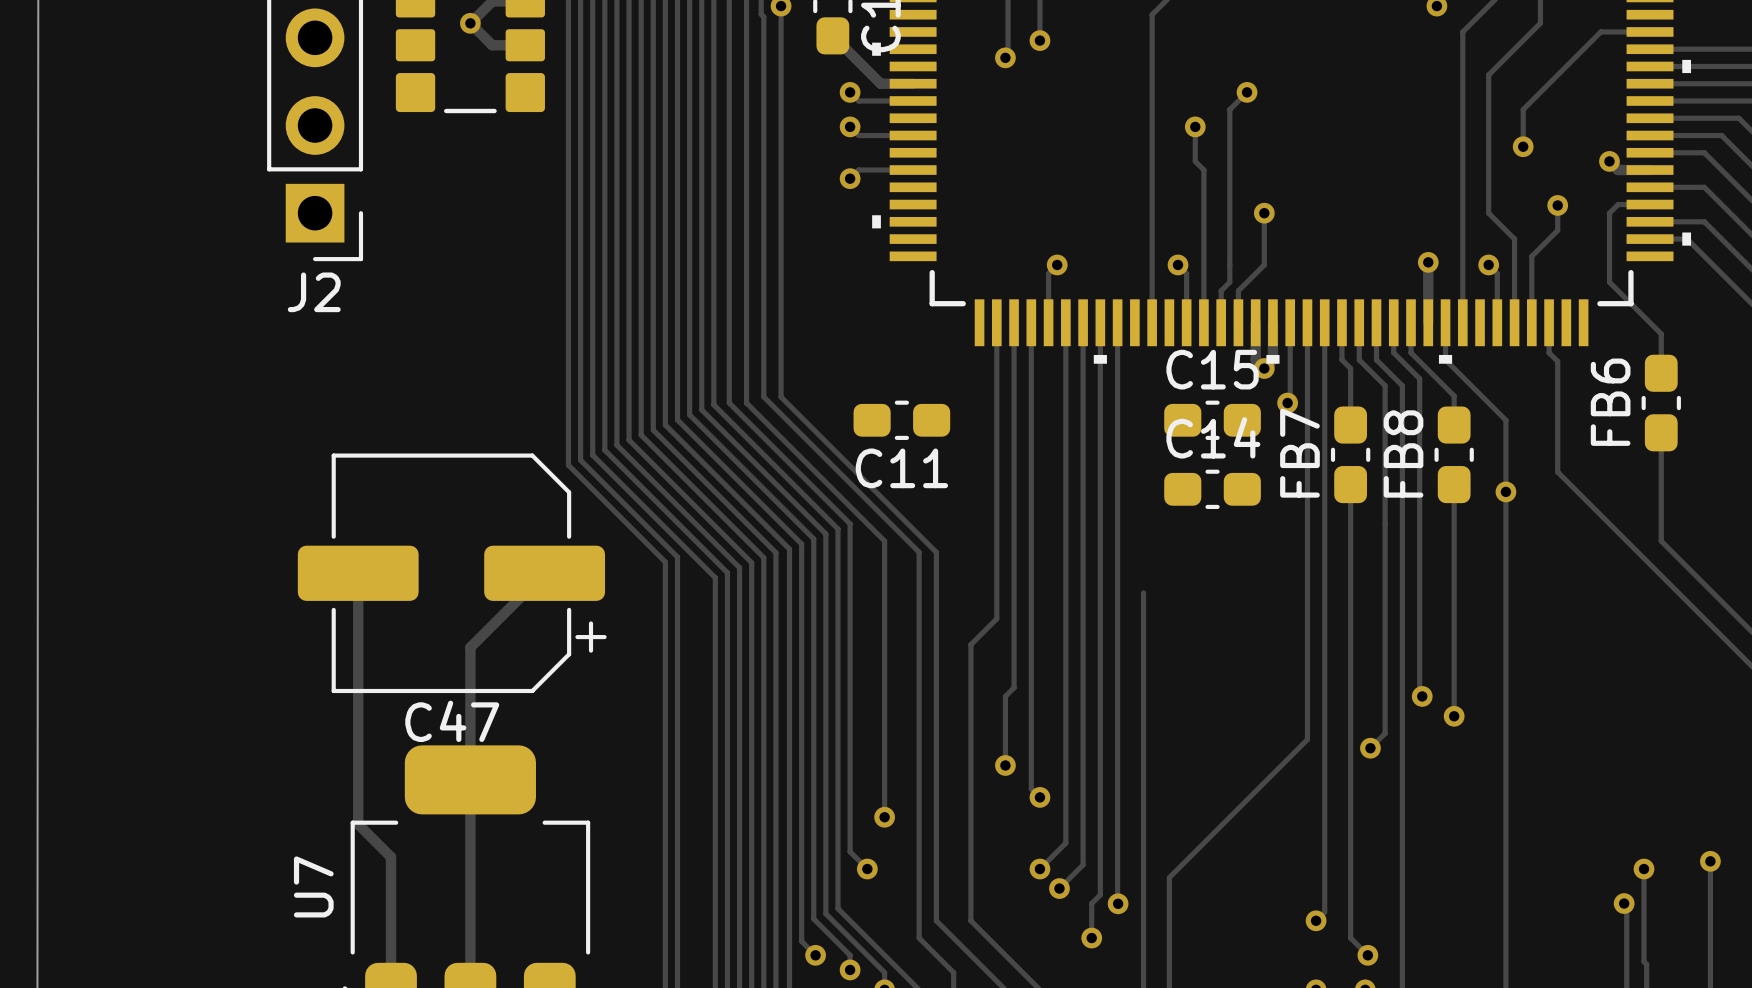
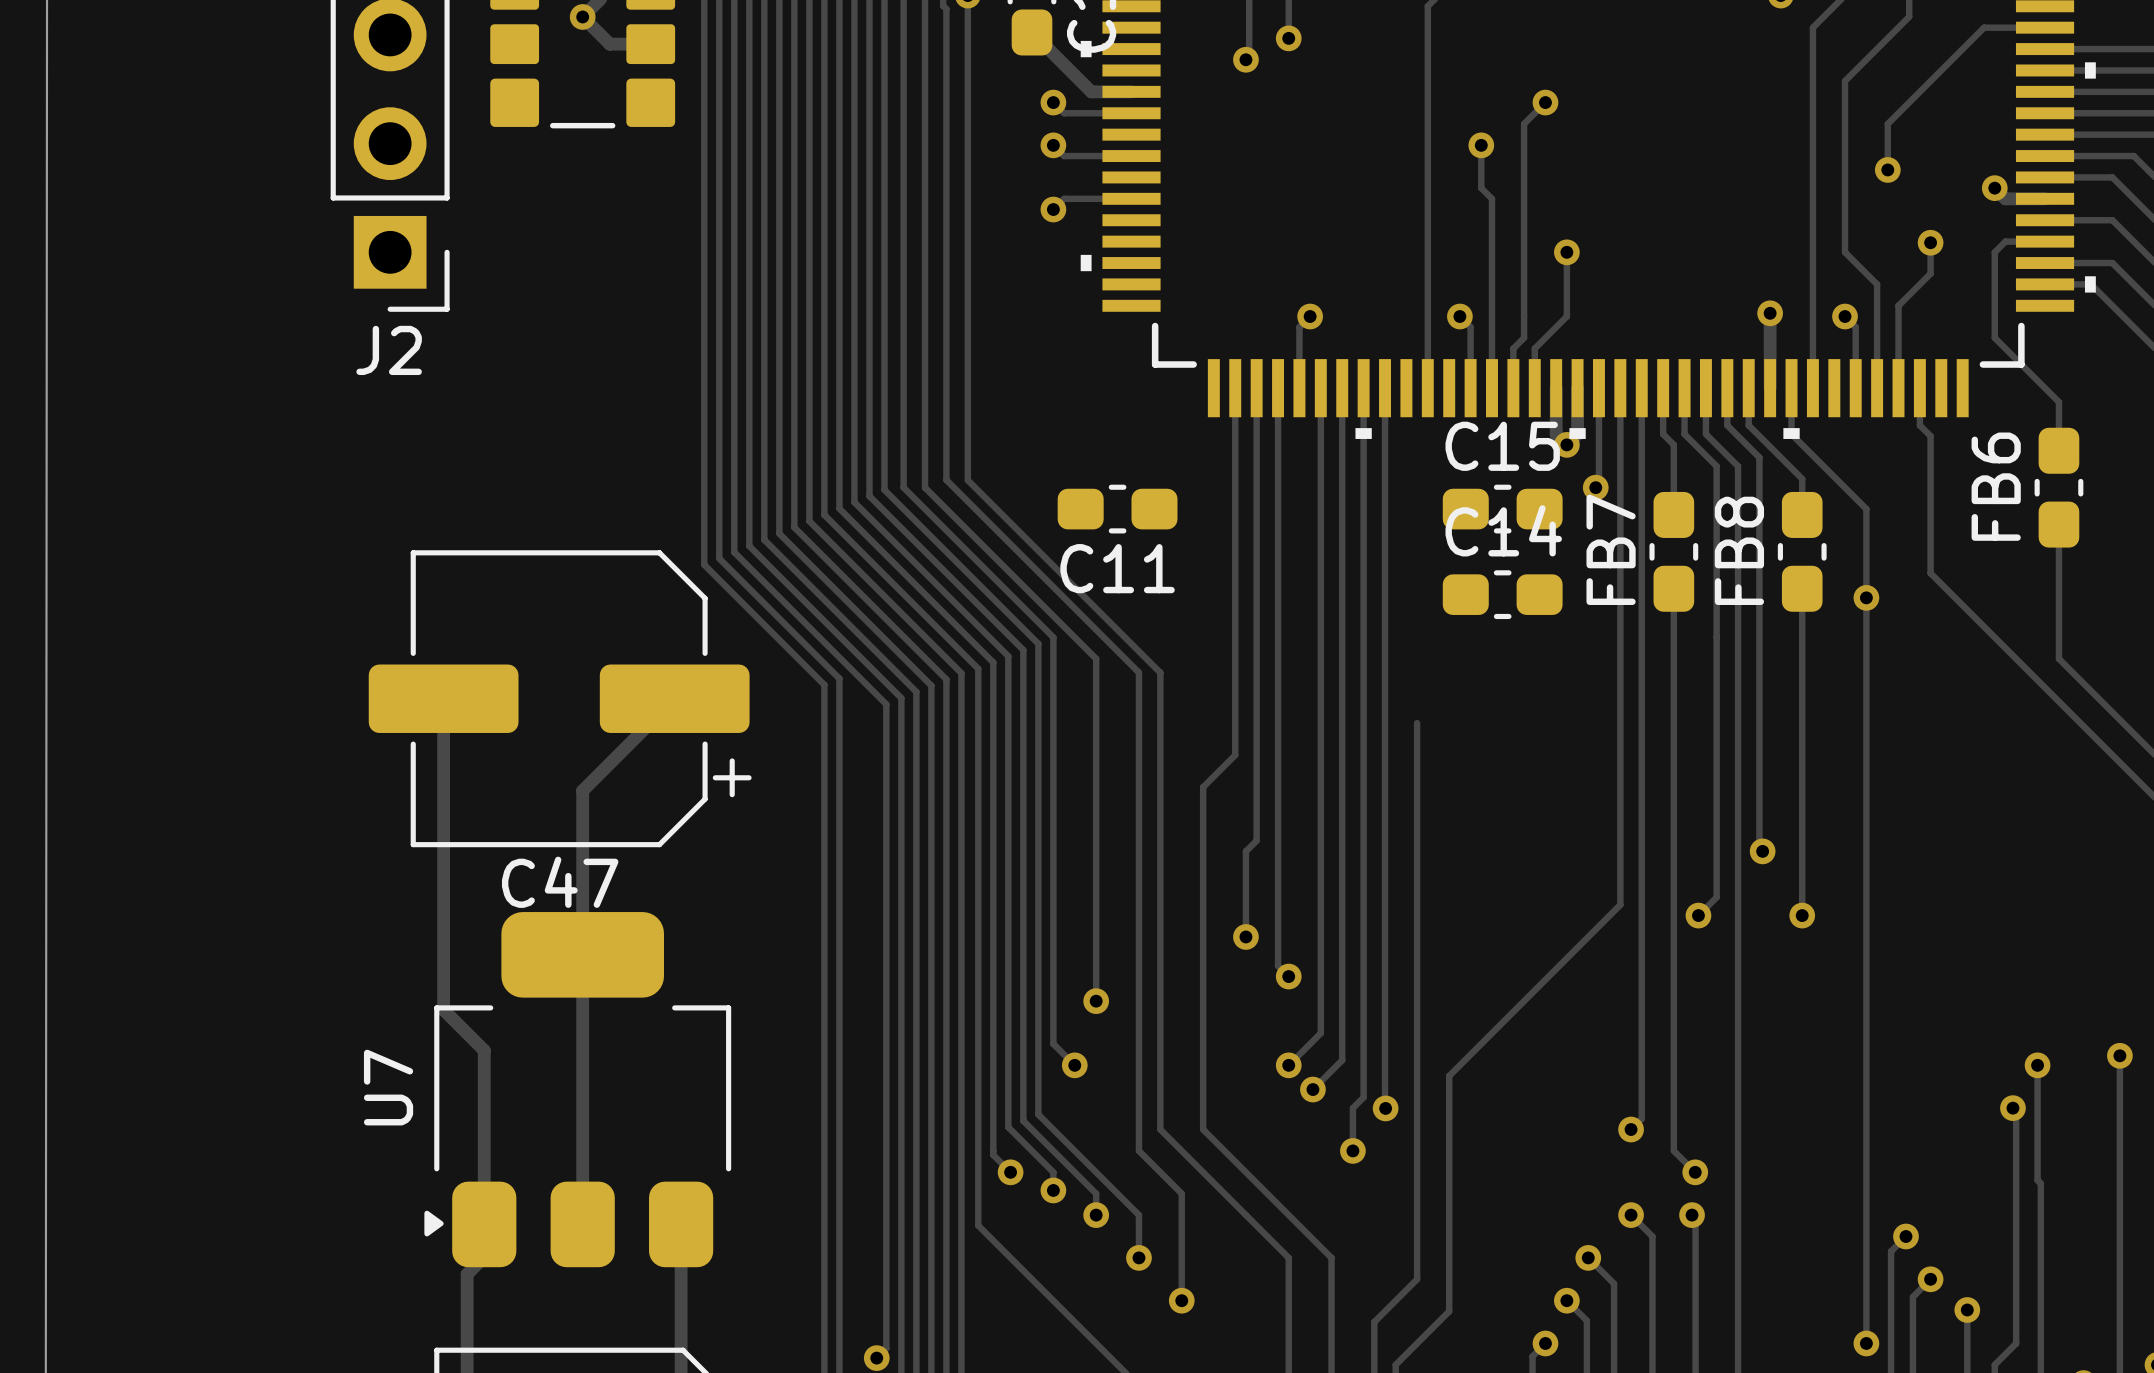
track: none -> (1802, 875) (1802, 915)
via position: (1454, 716) -> (1802, 915)

